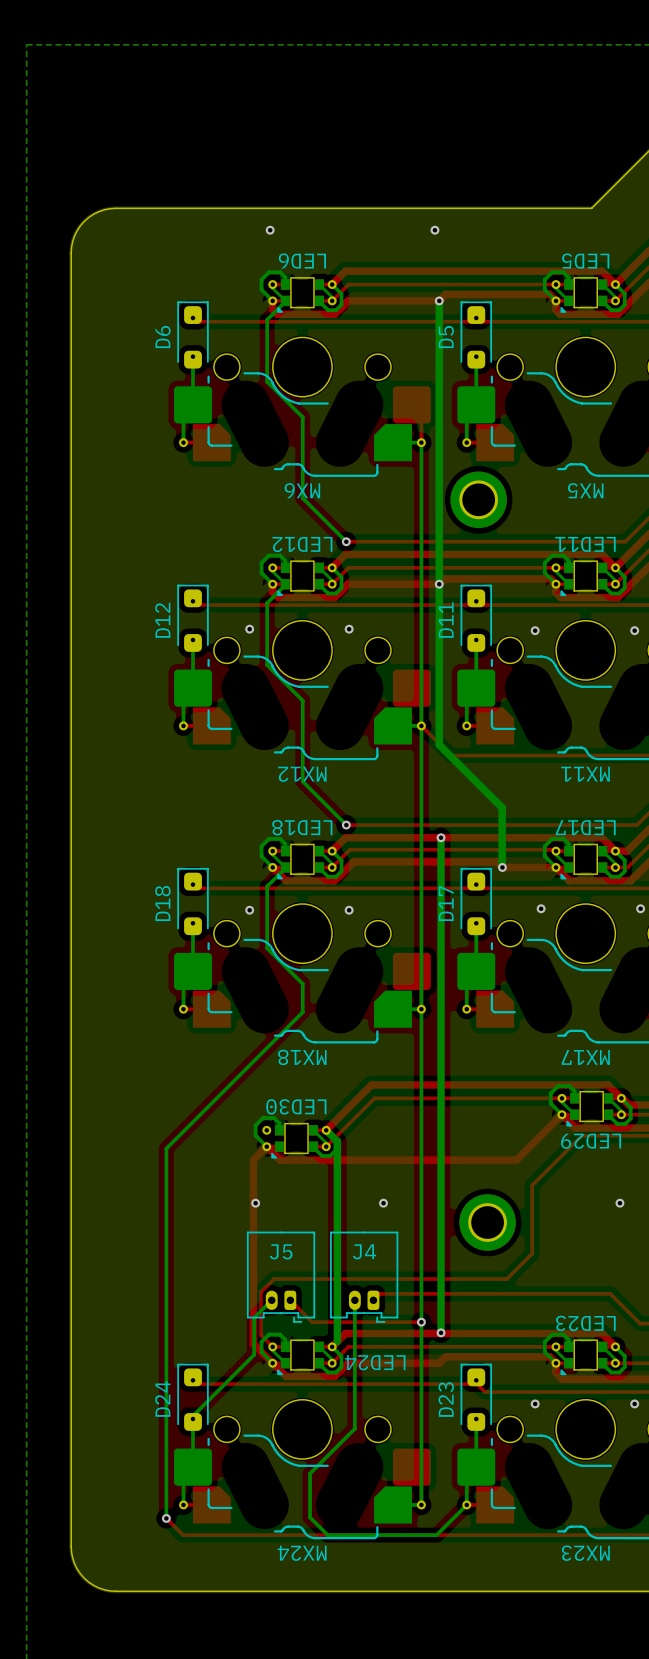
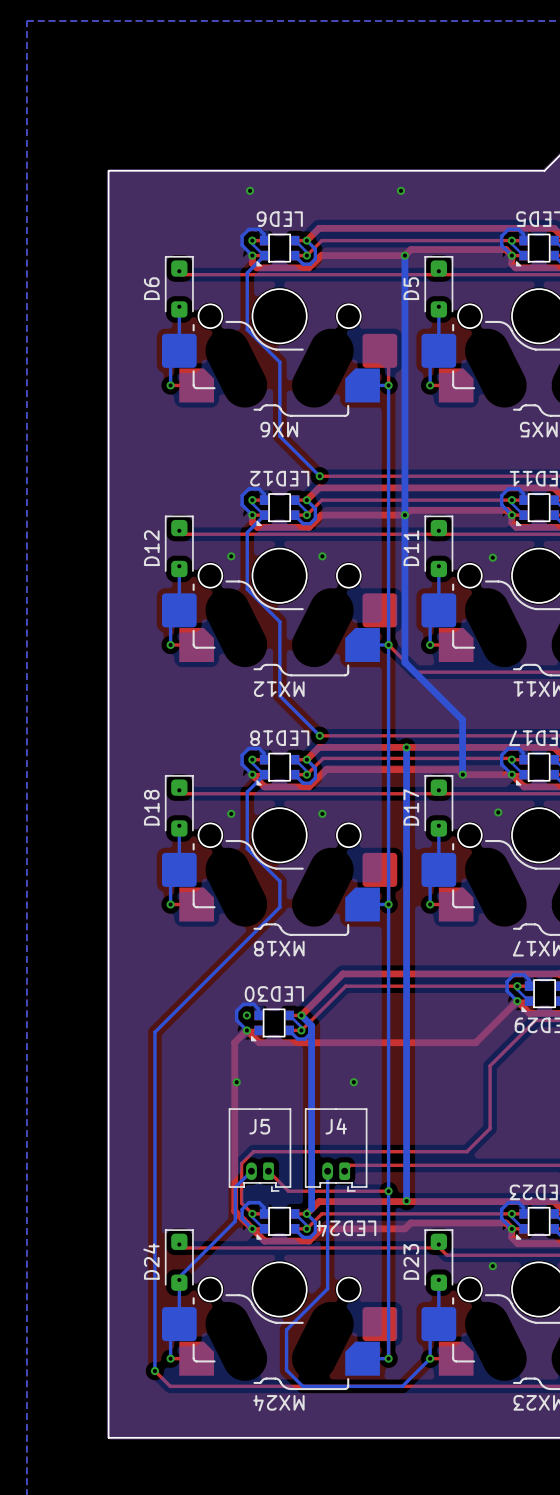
board edge: (115, 208) (98, 211) (84, 221) (74, 235) (71, 252) (71, 1546) (74, 1563) (84, 1578) (98, 1587) (115, 1591) -> (108, 170) (108, 1437)
part: (478, 499) -> none
part: (487, 1222) -> none

